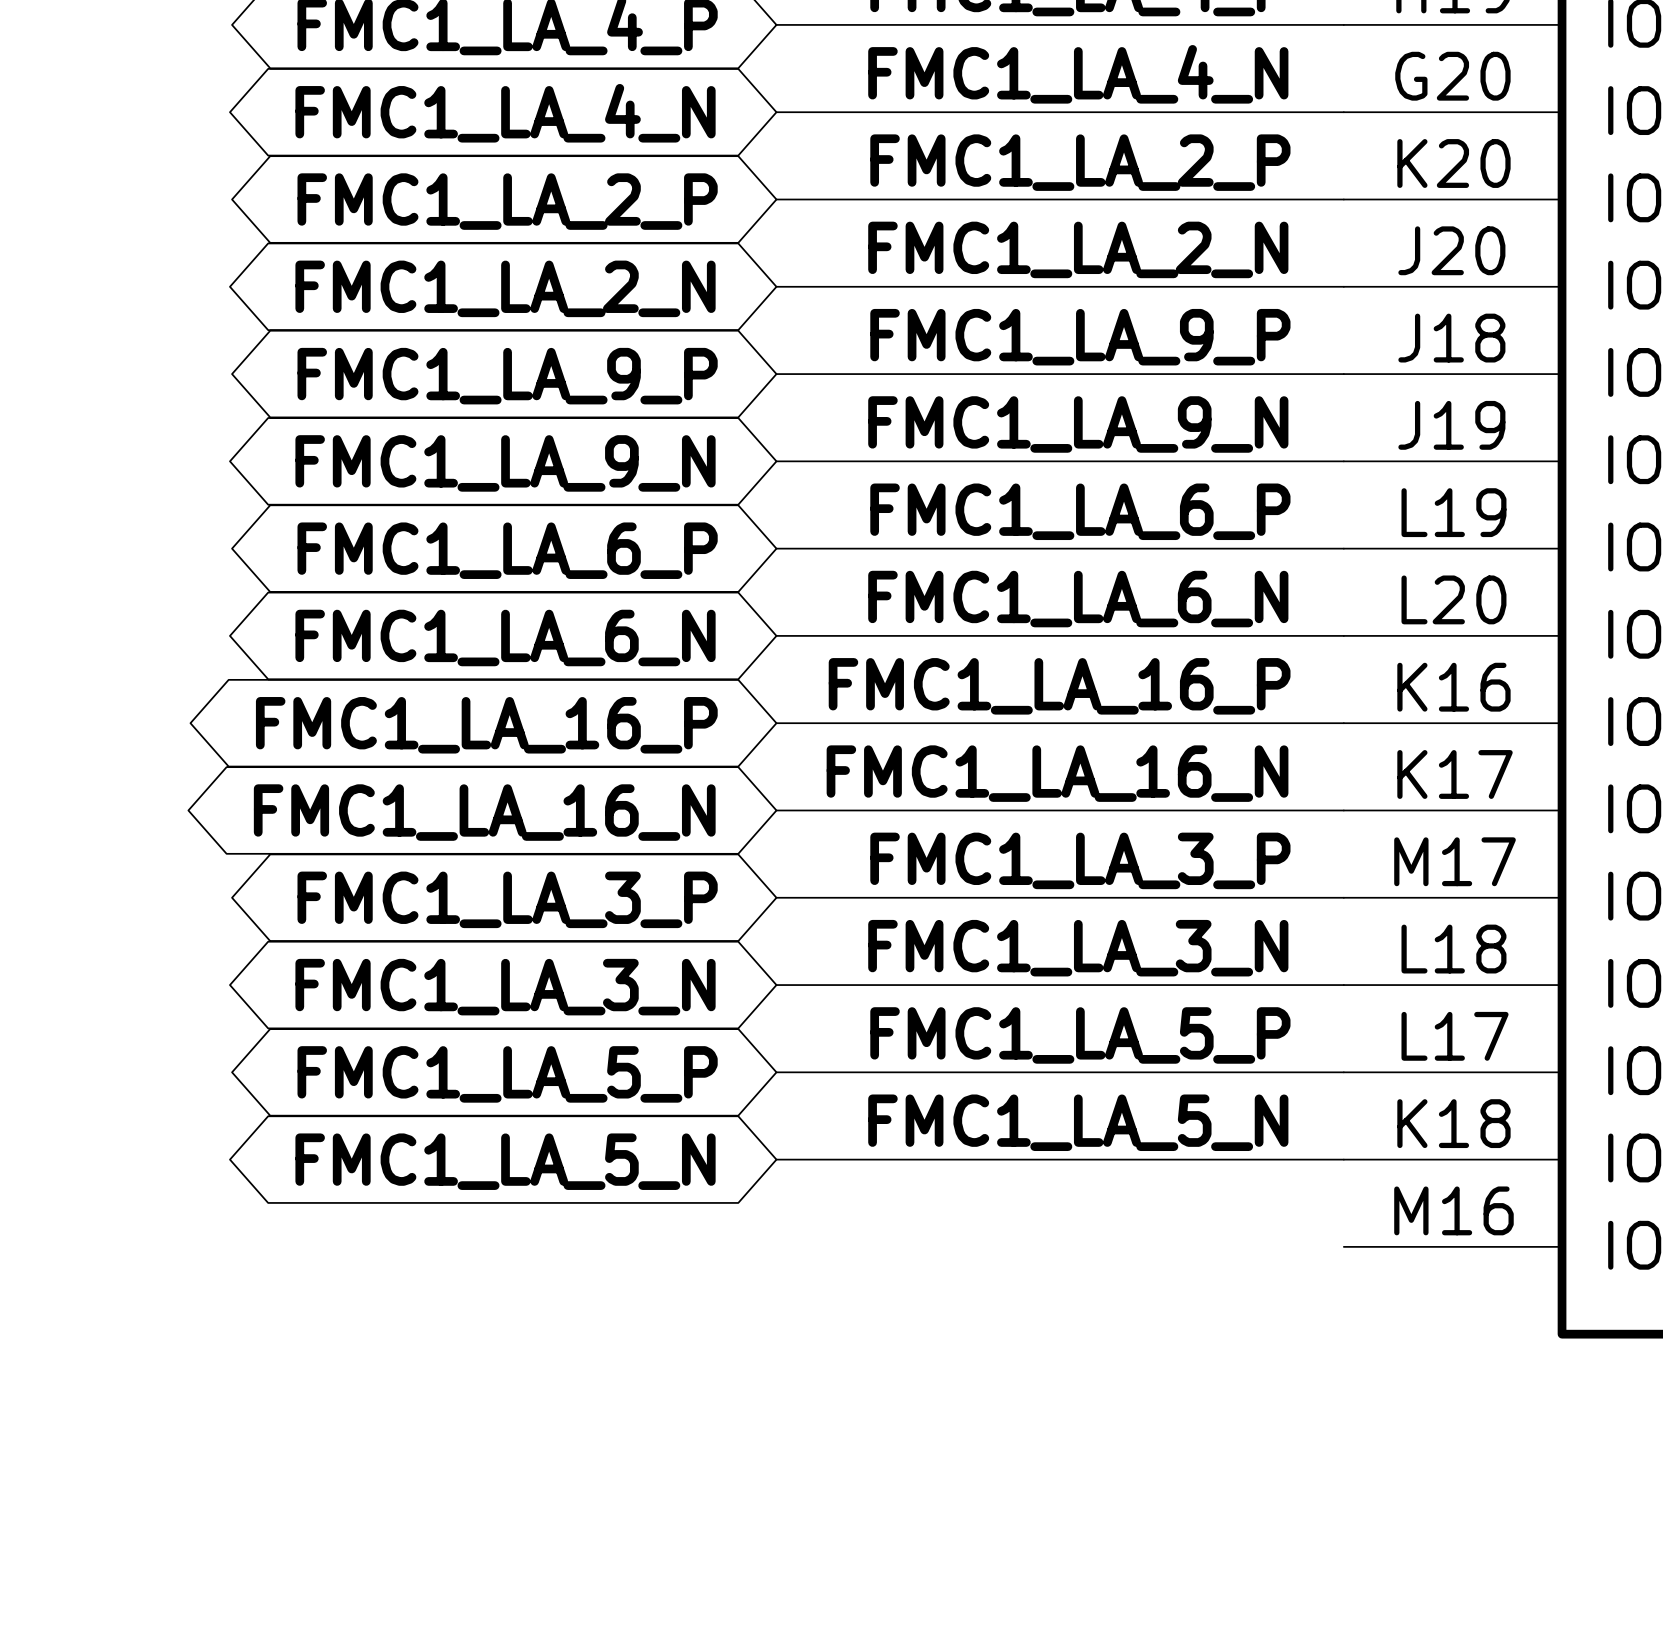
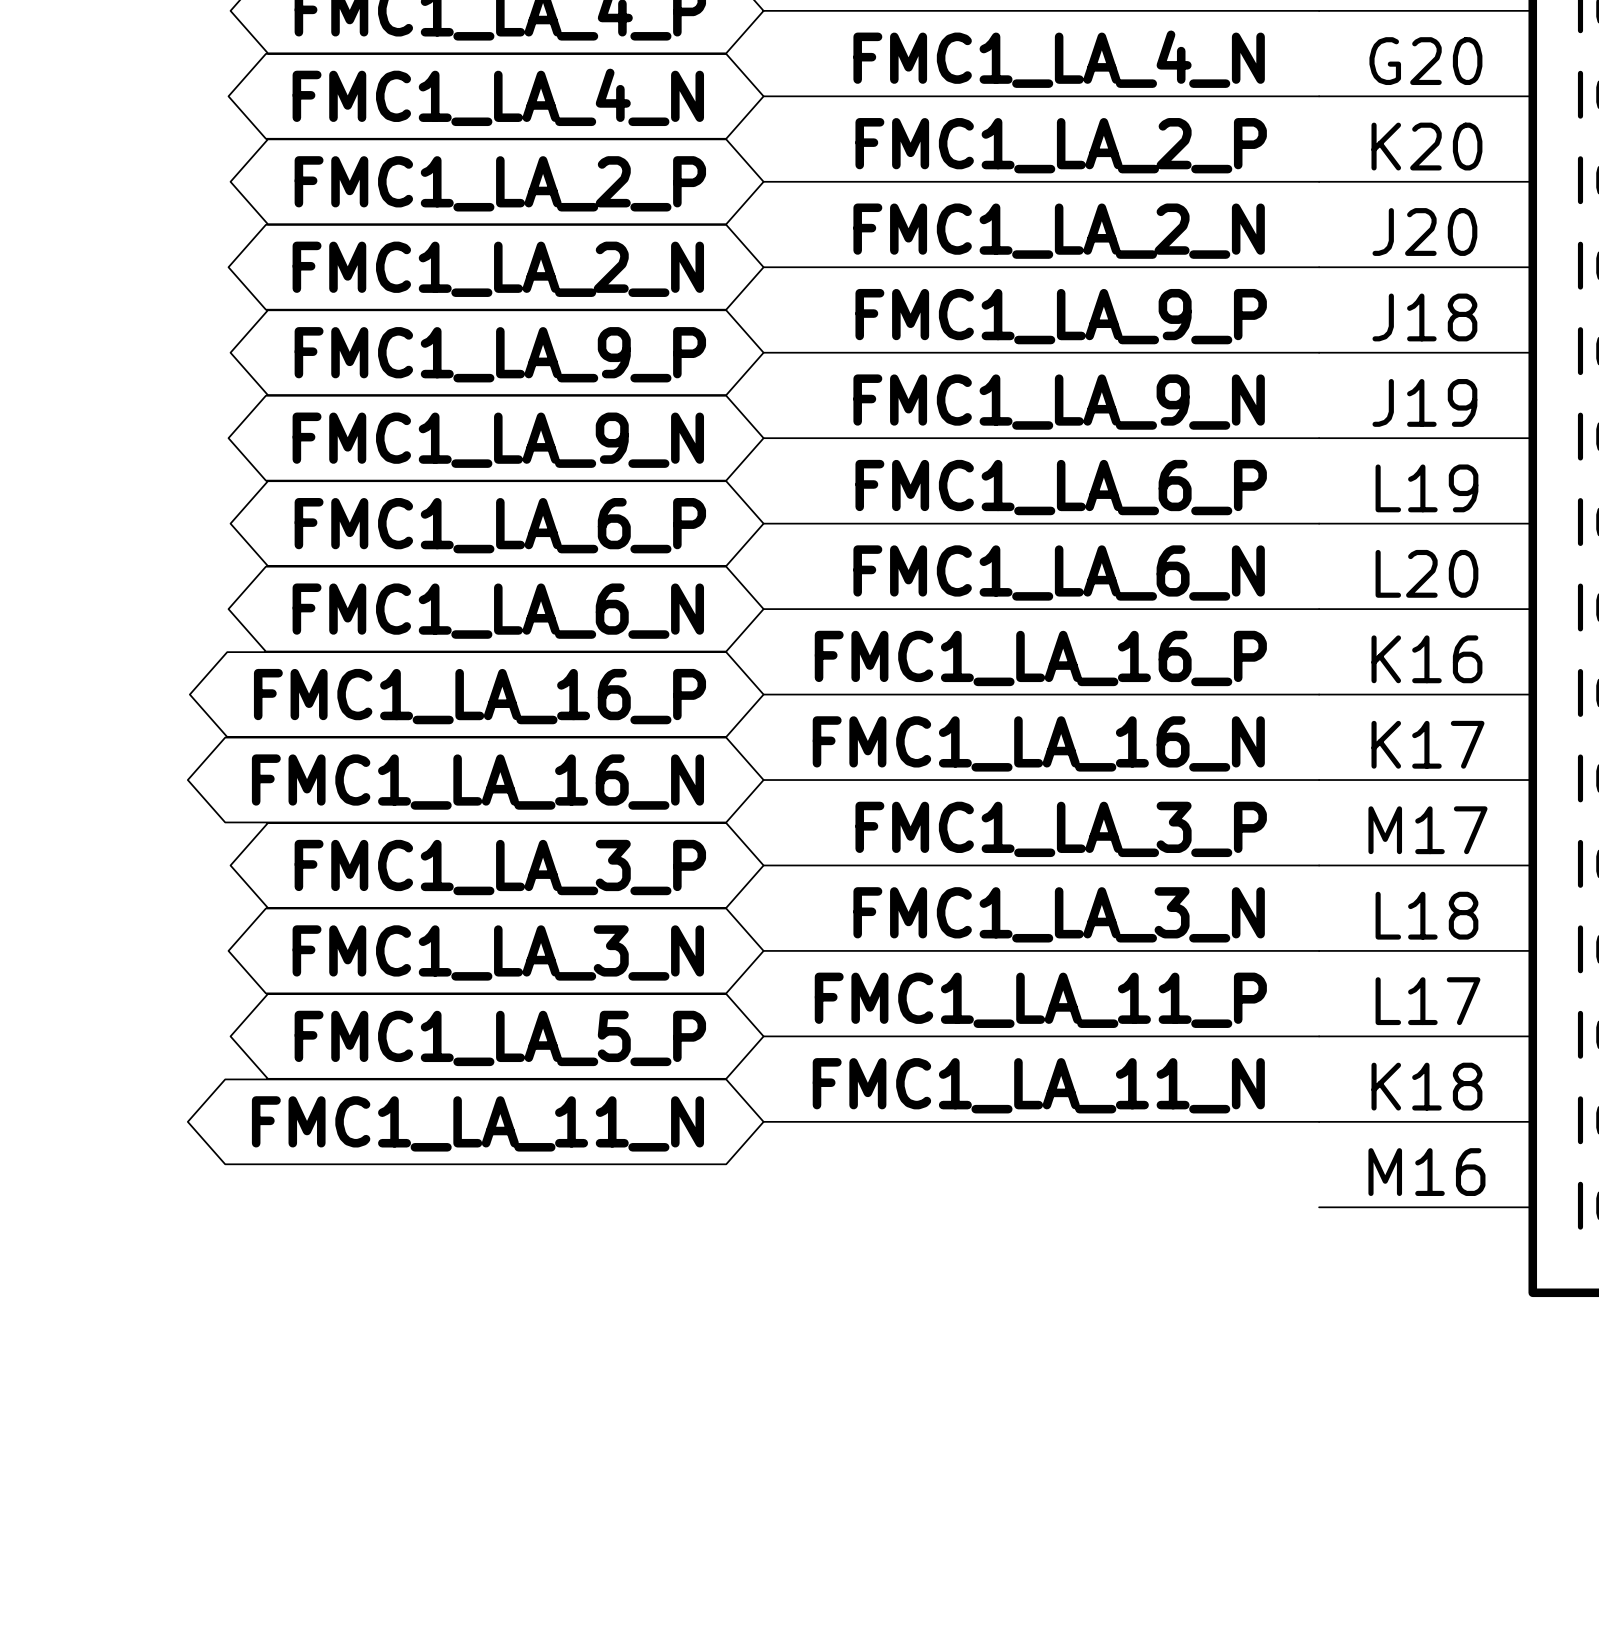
label: FMC1_LA_5_P (1080, 1035) -> FMC1_LA_11_P (1040, 1000)
label: FMC1_LA_5_N (1078, 1122) -> FMC1_LA_11_N (1038, 1085)
global label: FMC1_LA_5_N (505, 1161) -> FMC1_LA_11_N (477, 1123)

